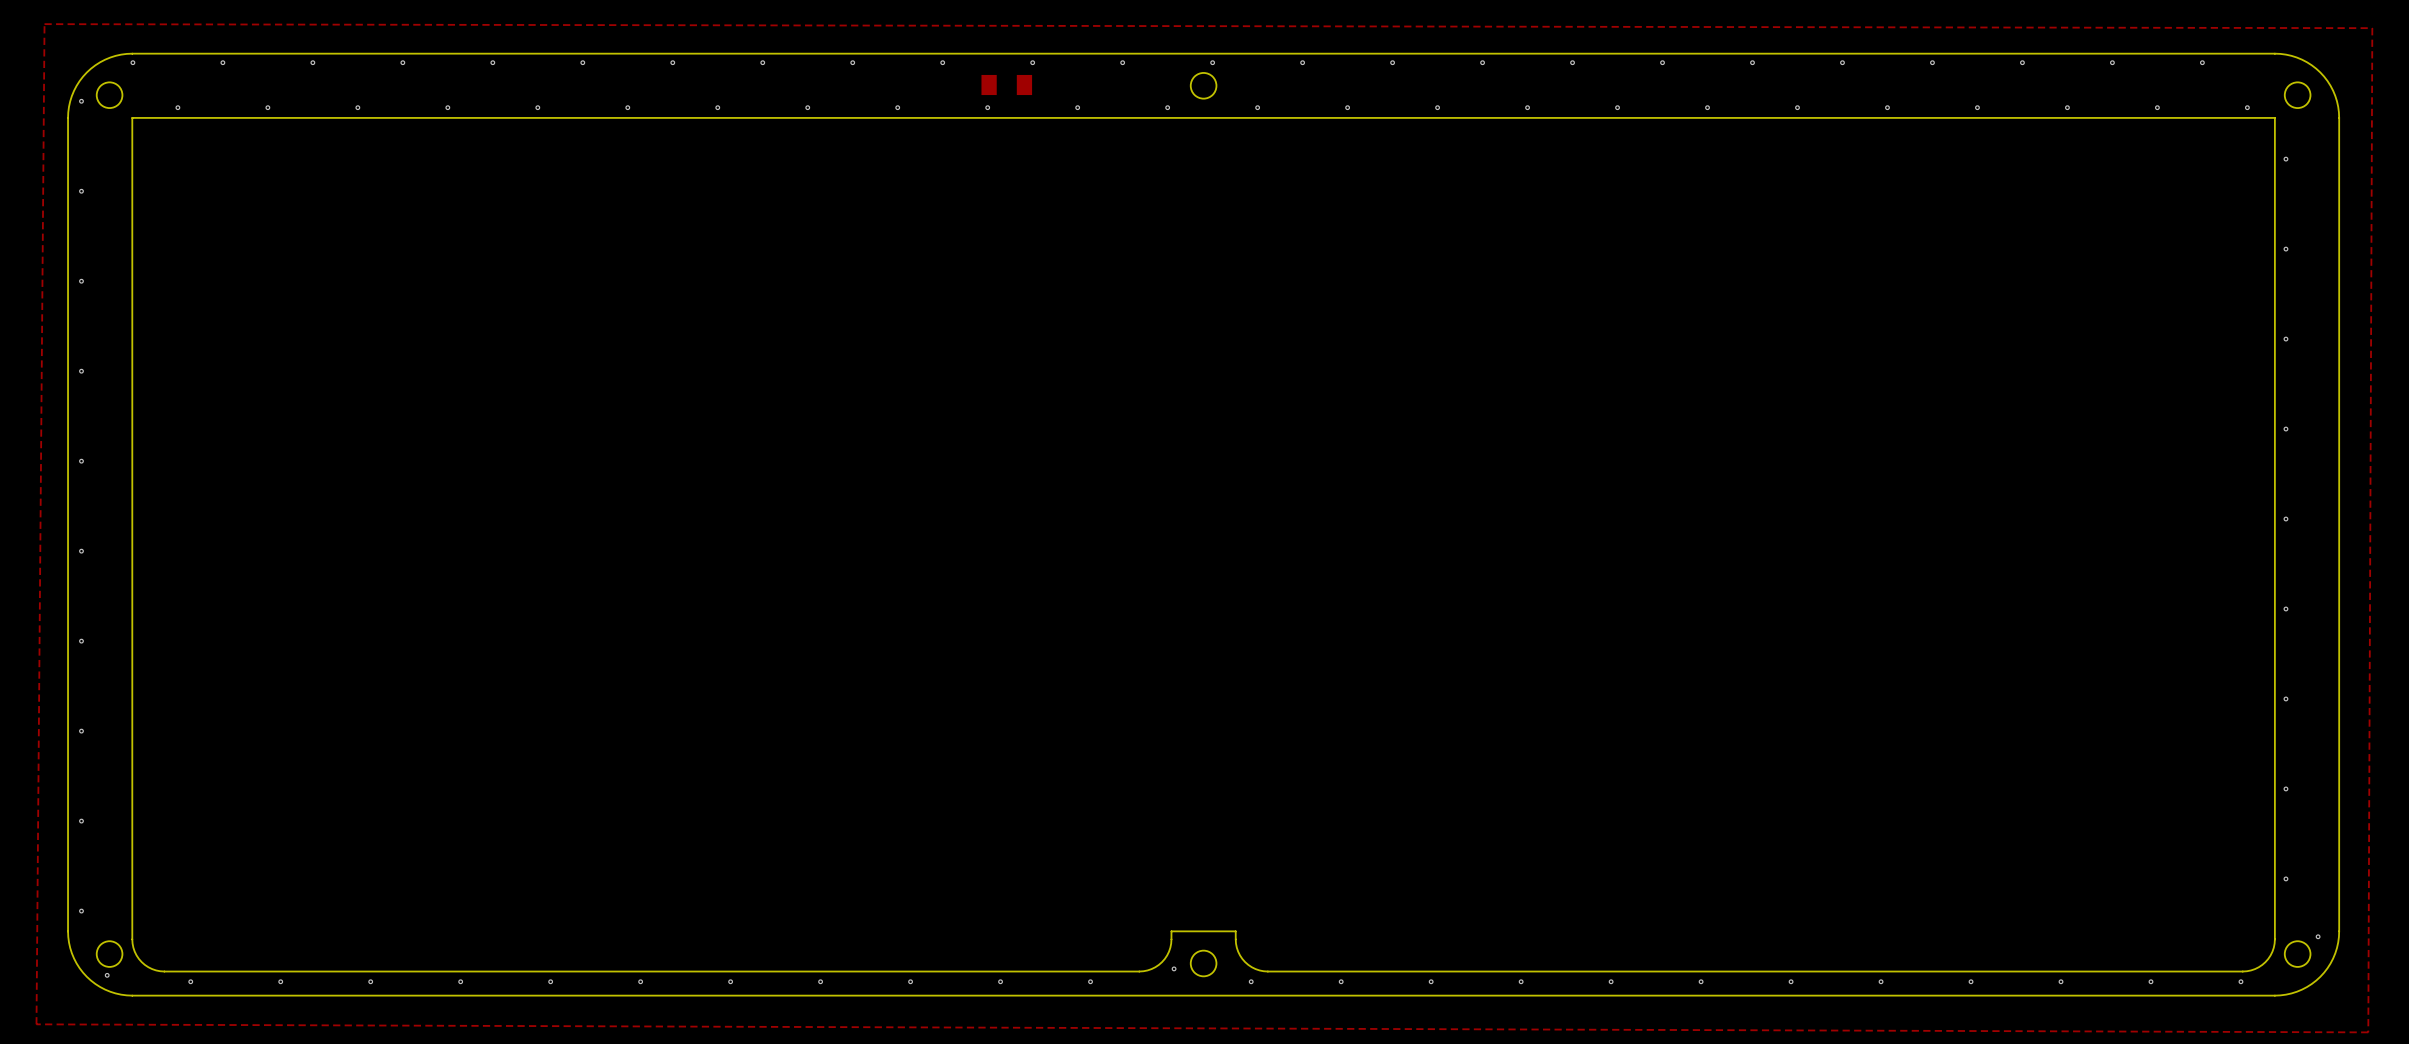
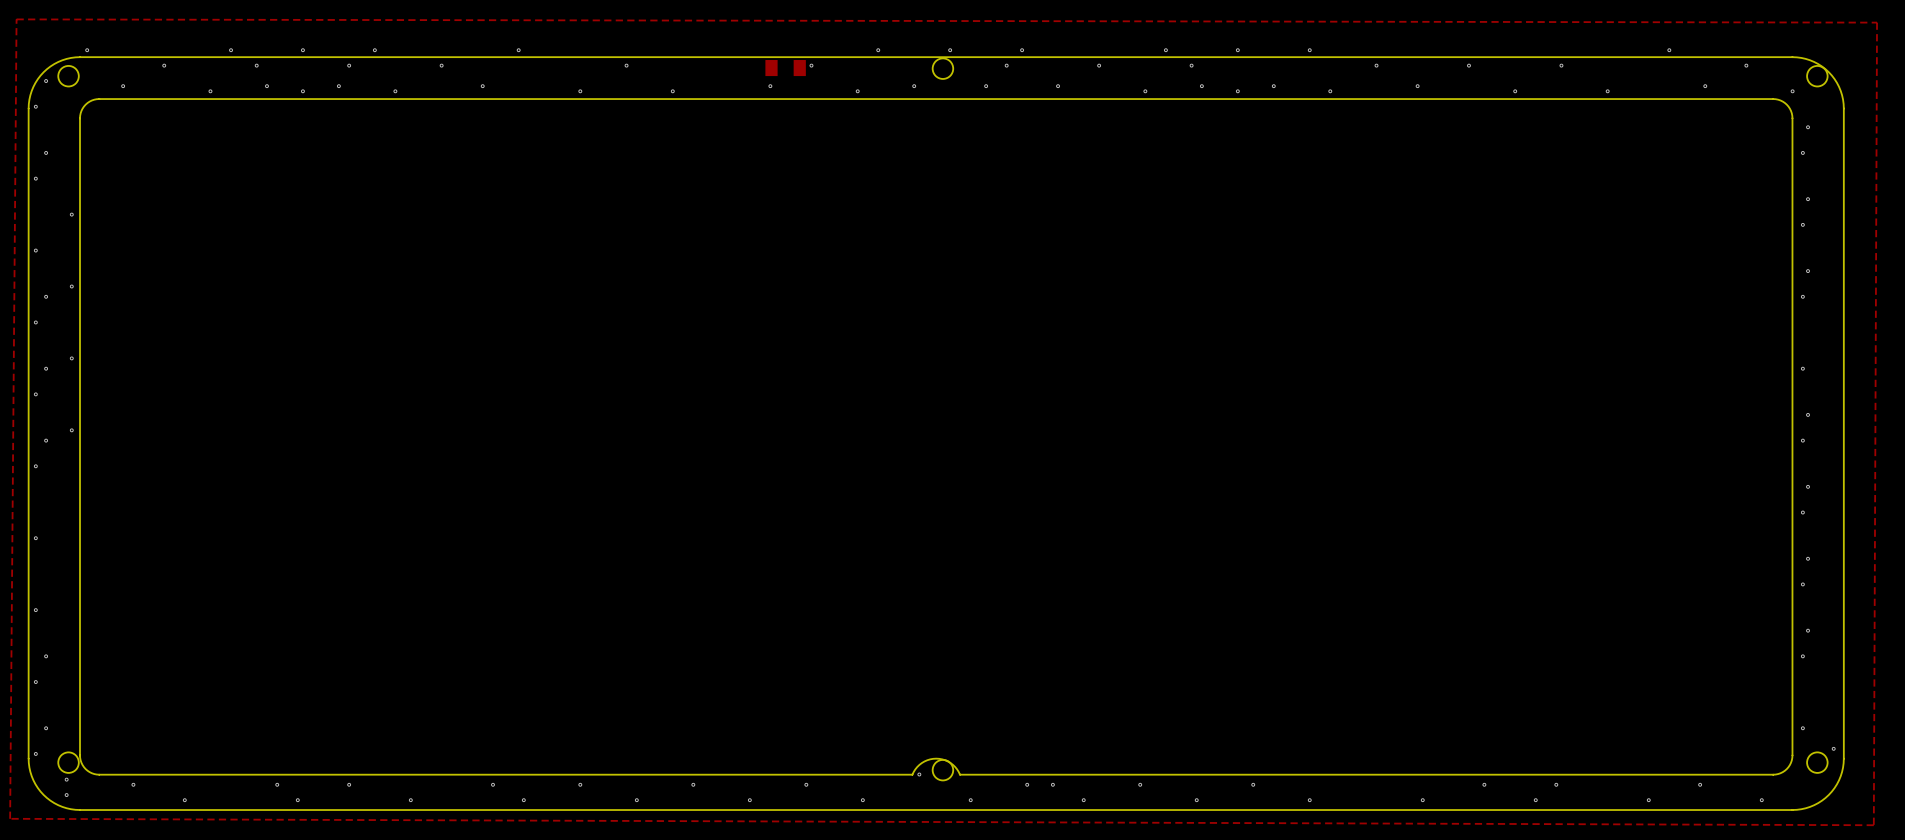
via position: (222, 62) -> (164, 65)
via position: (582, 62) -> (441, 65)
via: (762, 62) -> none
via: (852, 62) -> none
via: (942, 62) -> none
via position: (1032, 62) -> (811, 65)
via position: (1392, 62) -> (1099, 65)
via position: (1752, 62) -> (1376, 65)
via: (1842, 62) -> none
via: (1932, 62) -> none
via: (2022, 62) -> none
via position: (2202, 62) -> (1746, 65)
via: none -> (256, 65)
via: none -> (349, 65)
via: none -> (626, 65)
via: none -> (1006, 65)
via: none -> (1191, 65)
via: none -> (1468, 65)
via: none -> (1561, 65)
via position: (267, 107) -> (210, 91)
via position: (537, 107) -> (395, 91)
via: (717, 107) -> none
via: (807, 107) -> none
via: (897, 107) -> none
via position: (1077, 107) -> (857, 91)
via position: (1437, 107) -> (1145, 91)
via position: (1707, 107) -> (1330, 91)
via: (1887, 107) -> none
via: (1977, 107) -> none
via: (2067, 107) -> none
via position: (2247, 107) -> (1792, 91)
via: none -> (302, 91)
via: none -> (580, 91)
via: none -> (672, 91)
via: none -> (1237, 91)
via: none -> (1515, 91)
via: none -> (1607, 91)
board edge: (132, 117) (2274, 117) (2274, 939) (2272, 951) (2265, 962) (2258, 967) (2242, 971) (1267, 971) (1251, 967) (1242, 958) (1236, 947) (1235, 931) (1171, 931) (1170, 947) (1164, 958) (1155, 967) (1139, 971) (164, 971) (152, 969) (138, 958) (133, 947) (132, 939) (132, 117) -> (99, 99) (85, 104) (80, 118) (80, 755) (82, 765) (91, 773) (912, 774) (921, 763) (936, 758) (950, 763) (960, 774) (1773, 774) (1784, 770) (1791, 762) (1792, 118) (1788, 106) (1780, 100) (99, 99)
via: none -> (35, 106)
via: none -> (1802, 152)
via: none -> (35, 178)
via: none -> (71, 214)
via: (81, 281) -> none
via: none -> (1802, 224)
via: none -> (35, 250)
via: none -> (71, 286)
via: none -> (1802, 296)
via: none -> (35, 322)
via: (2285, 429) -> none
via: none -> (71, 358)
via: none -> (1802, 368)
via: none -> (35, 394)
via: none -> (71, 430)
via: none -> (1802, 440)
via: none -> (35, 466)
via: (81, 641) -> none
via: none -> (1802, 512)
via: none -> (35, 538)
via: (81, 731) -> none
via: none -> (1802, 584)
via: none -> (35, 610)
via: none -> (1802, 656)
via: none -> (35, 682)
via: (2285, 878) -> none
via: none -> (1802, 728)
via: none -> (35, 753)
via position: (280, 981) -> (184, 800)
via position: (550, 981) -> (410, 800)
via position: (730, 981) -> (580, 784)
via position: (820, 981) -> (636, 800)
via position: (910, 981) -> (693, 784)
via: (1000, 981) -> none
via: none -> (806, 784)
via position: (1090, 981) -> (862, 800)
via position: (1251, 981) -> (970, 800)
via: none -> (1027, 784)
via position: (1431, 981) -> (1140, 784)
via position: (1521, 981) -> (1196, 800)
via position: (1611, 981) -> (1253, 784)
via: (1701, 981) -> none
via position: (1791, 981) -> (1422, 800)
via position: (2061, 981) -> (1648, 800)
via position: (2240, 981) -> (1761, 800)
via: none -> (66, 795)
board edge: (132, 995) (105, 989) (86, 976) (74, 958) (68, 931) (68, 112) (71, 95) (79, 81) (95, 65) (110, 57) (132, 53) (2274, 53) (2291, 55) (2311, 65) (2324, 76) (2335, 95) (2339, 117) (2339, 931) (2336, 947) (2327, 968) (2311, 984) (2296, 991) (2274, 995) (132, 995) -> (80, 57) (58, 61) (43, 72) (33, 86) (28, 108) (28, 763) (31, 776) (37, 788) (50, 800) (62, 806) (80, 810) (1792, 810) (1805, 808) (1821, 800) (1831, 791) (1840, 776) (1843, 758) (1843, 108) (1842, 95) (1834, 79) (1821, 66) (1810, 60) (1792, 57) (80, 57)
via: none -> (297, 800)
via: none -> (523, 800)
via: none -> (749, 800)
via: none -> (1083, 800)
via: none -> (1309, 800)
via: none -> (1535, 800)

